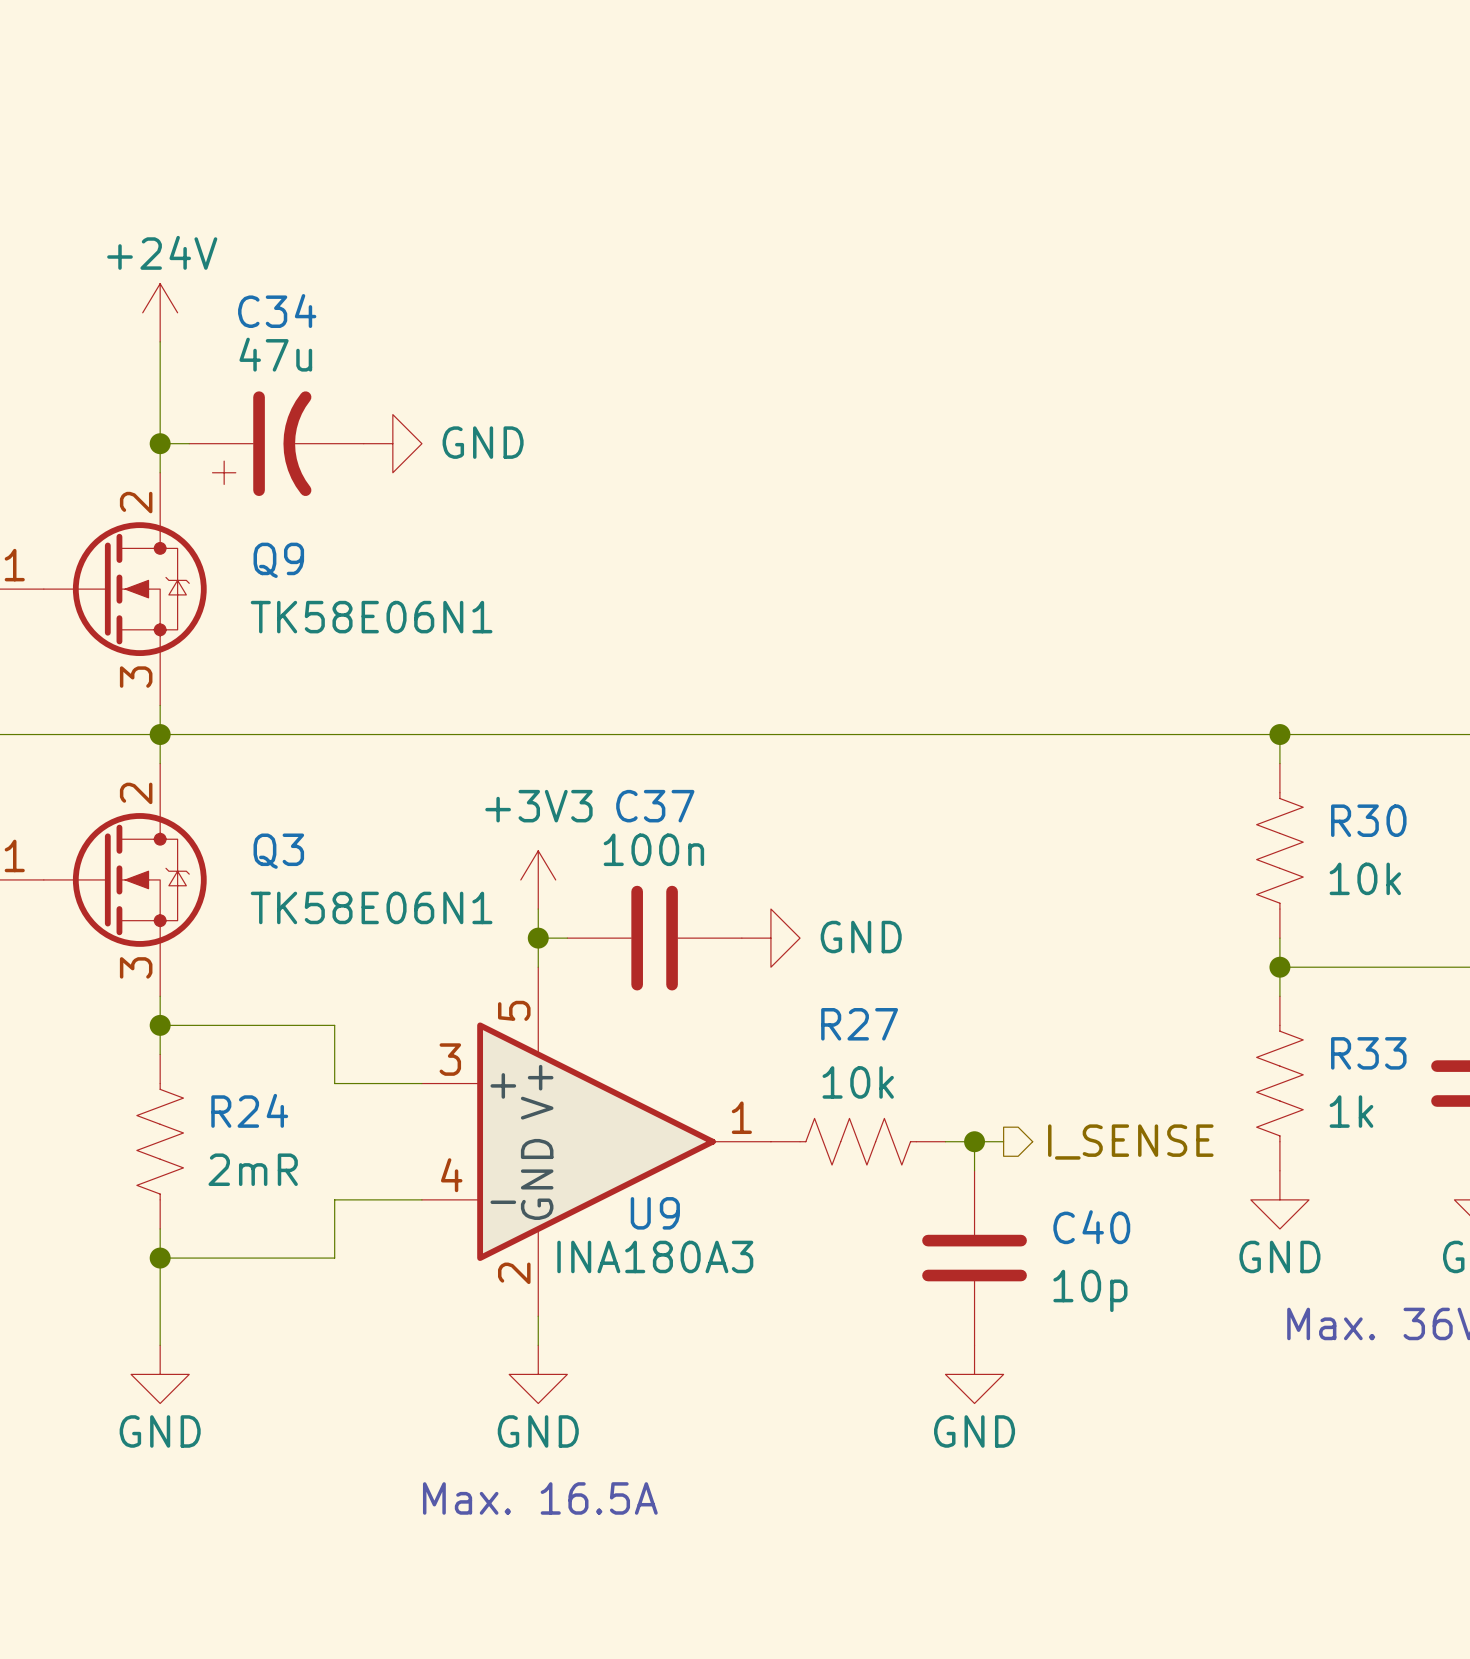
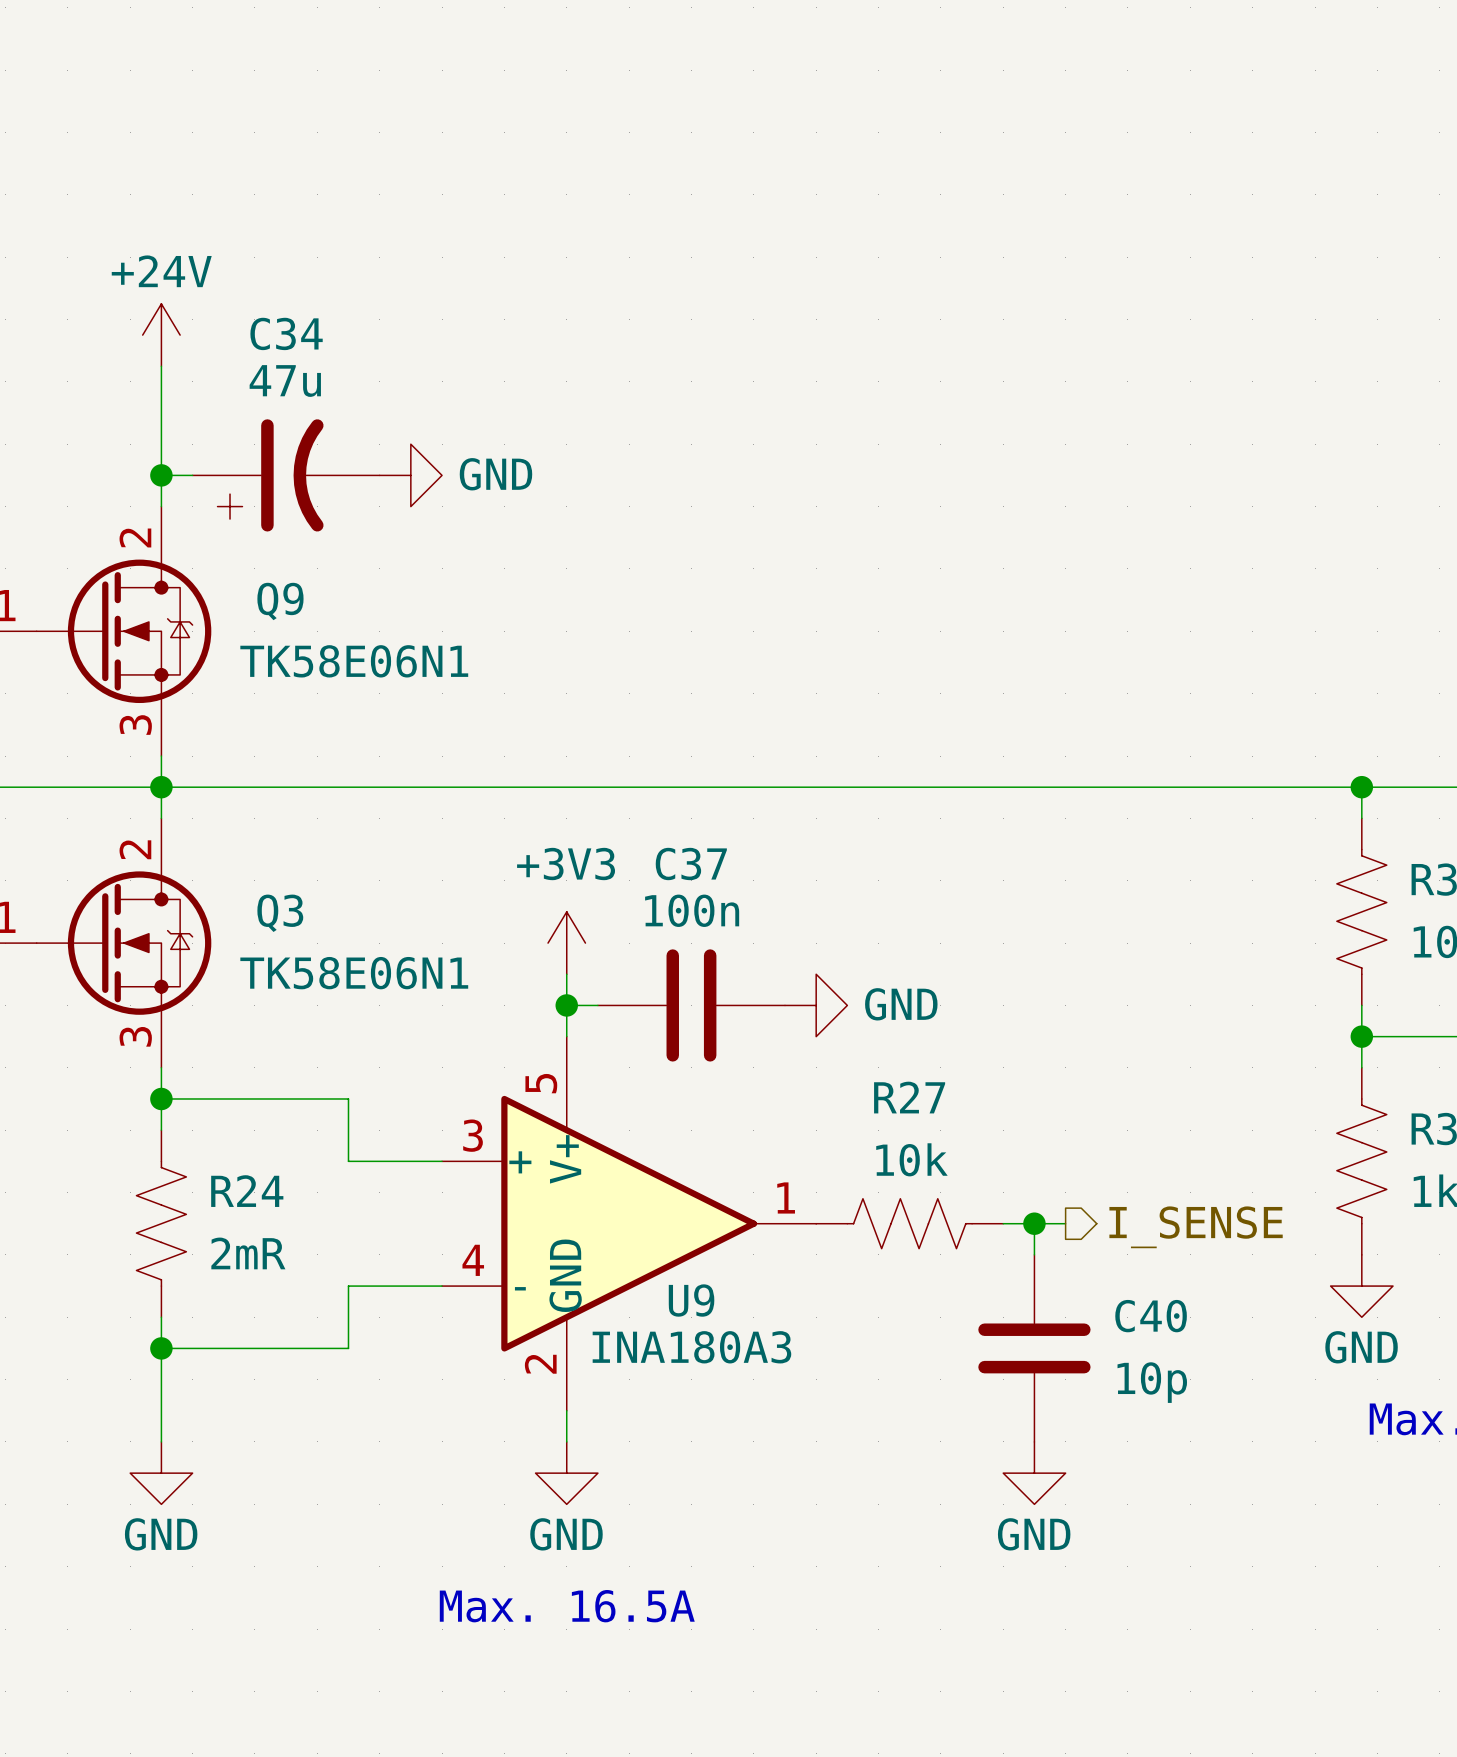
Q9 value position: TK58E06N1 (371, 617) -> TK58E06N1 (354, 661)
Q3 value position: TK58E06N1 (371, 907) -> TK58E06N1 (354, 973)

